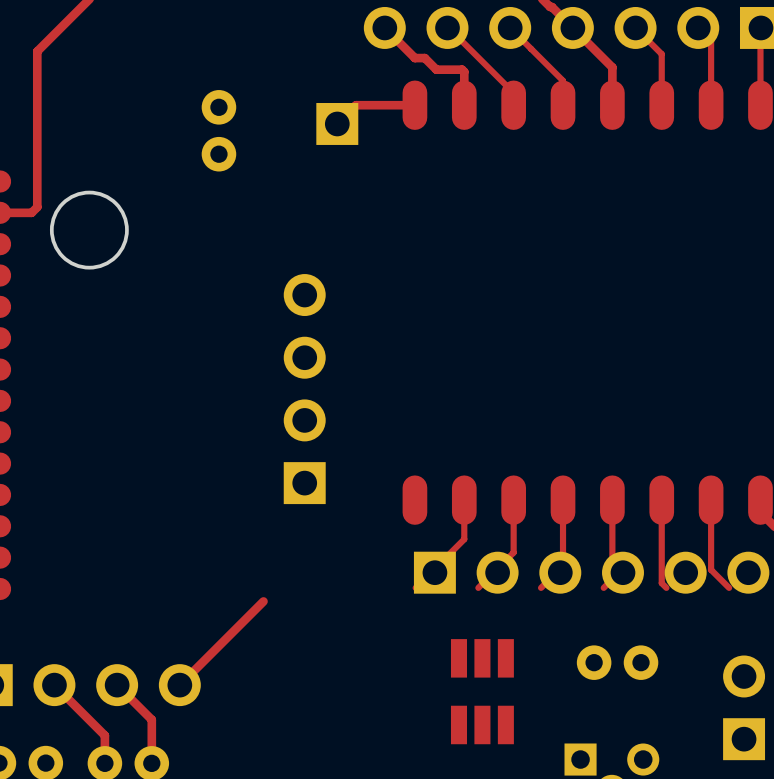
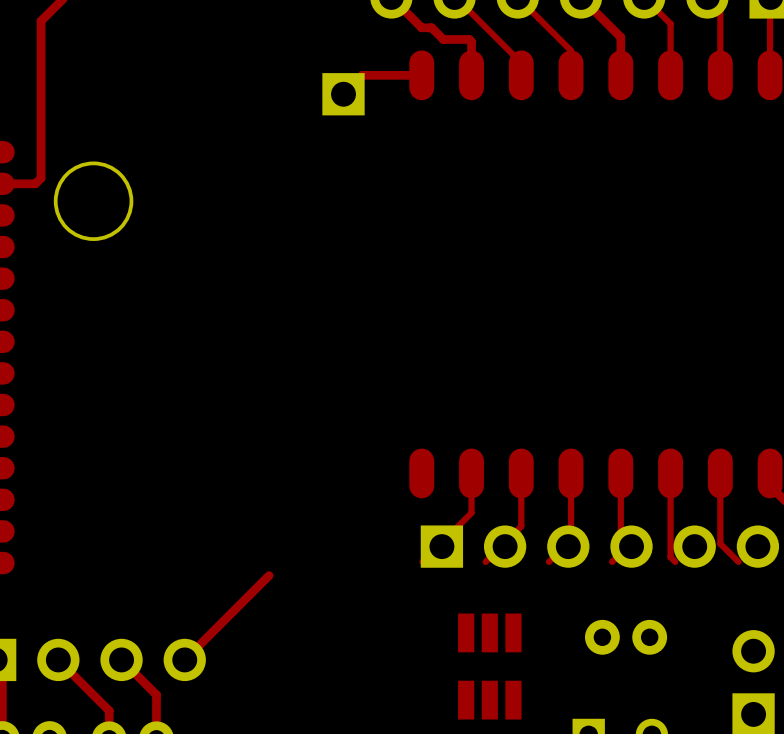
part: (218, 130) -> none
part: (304, 389) -> none

